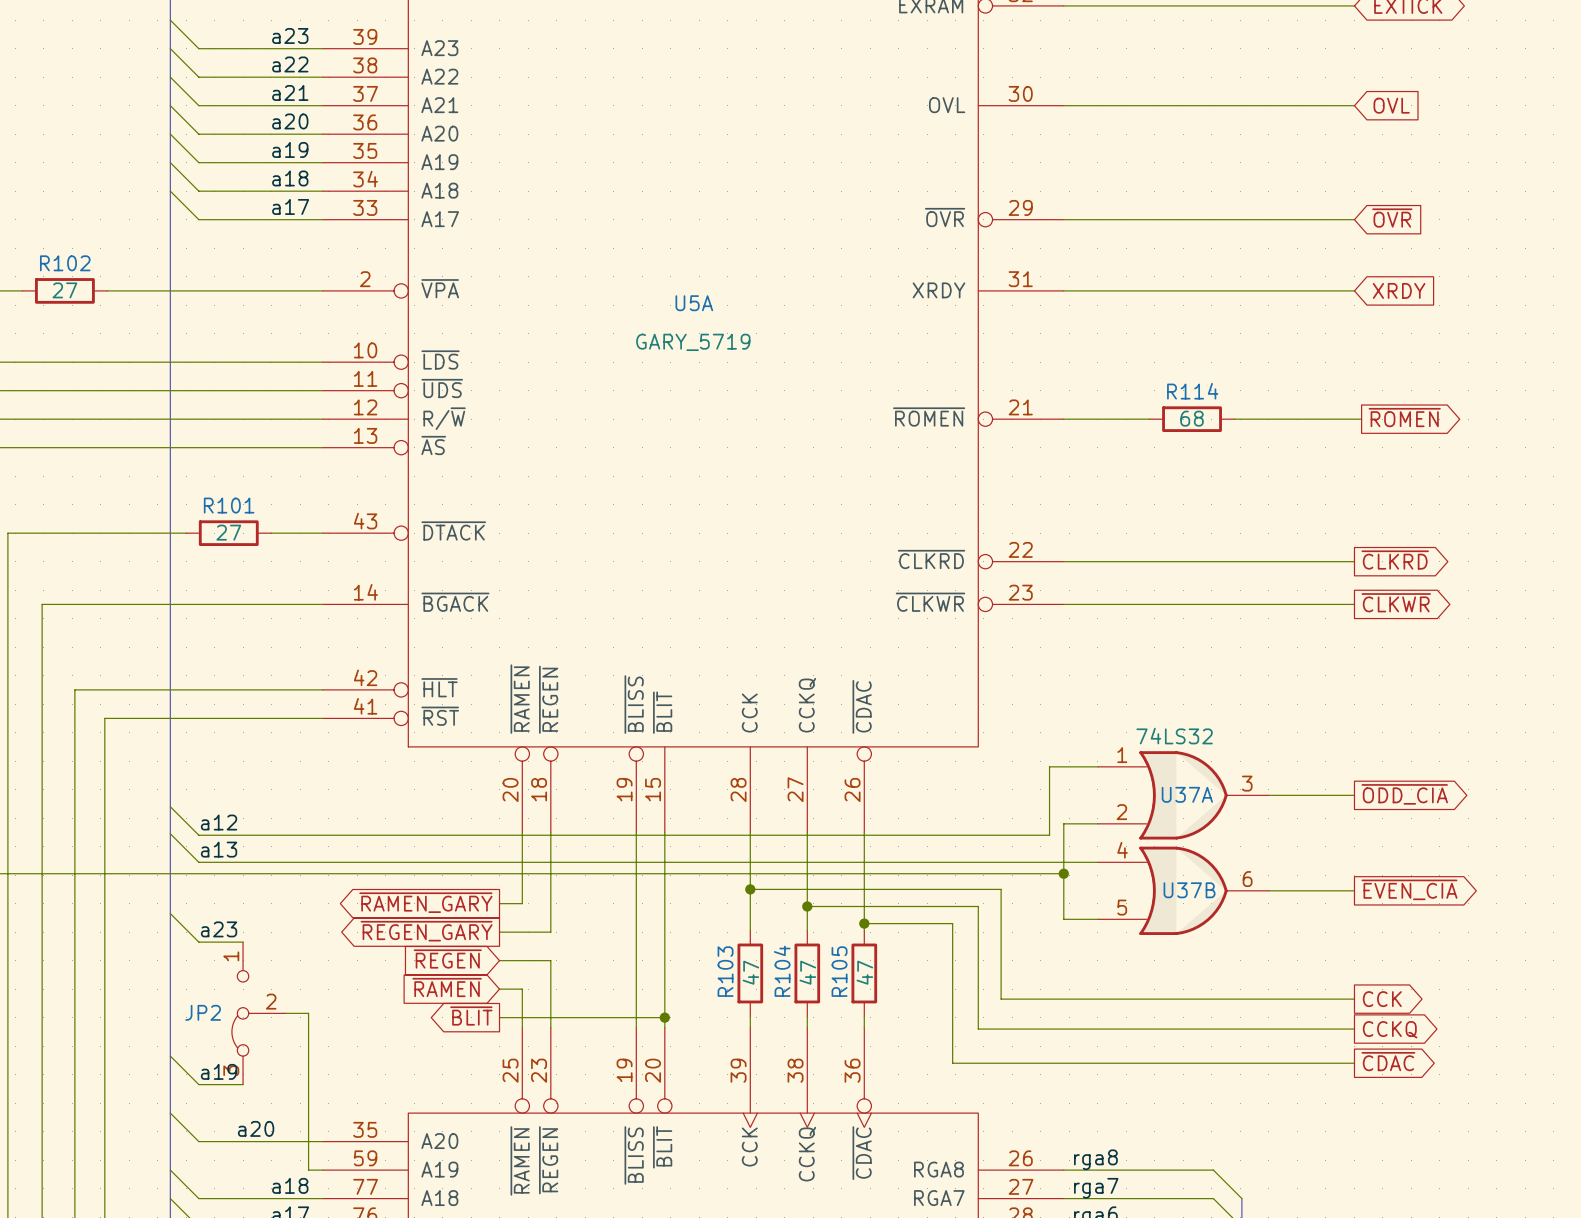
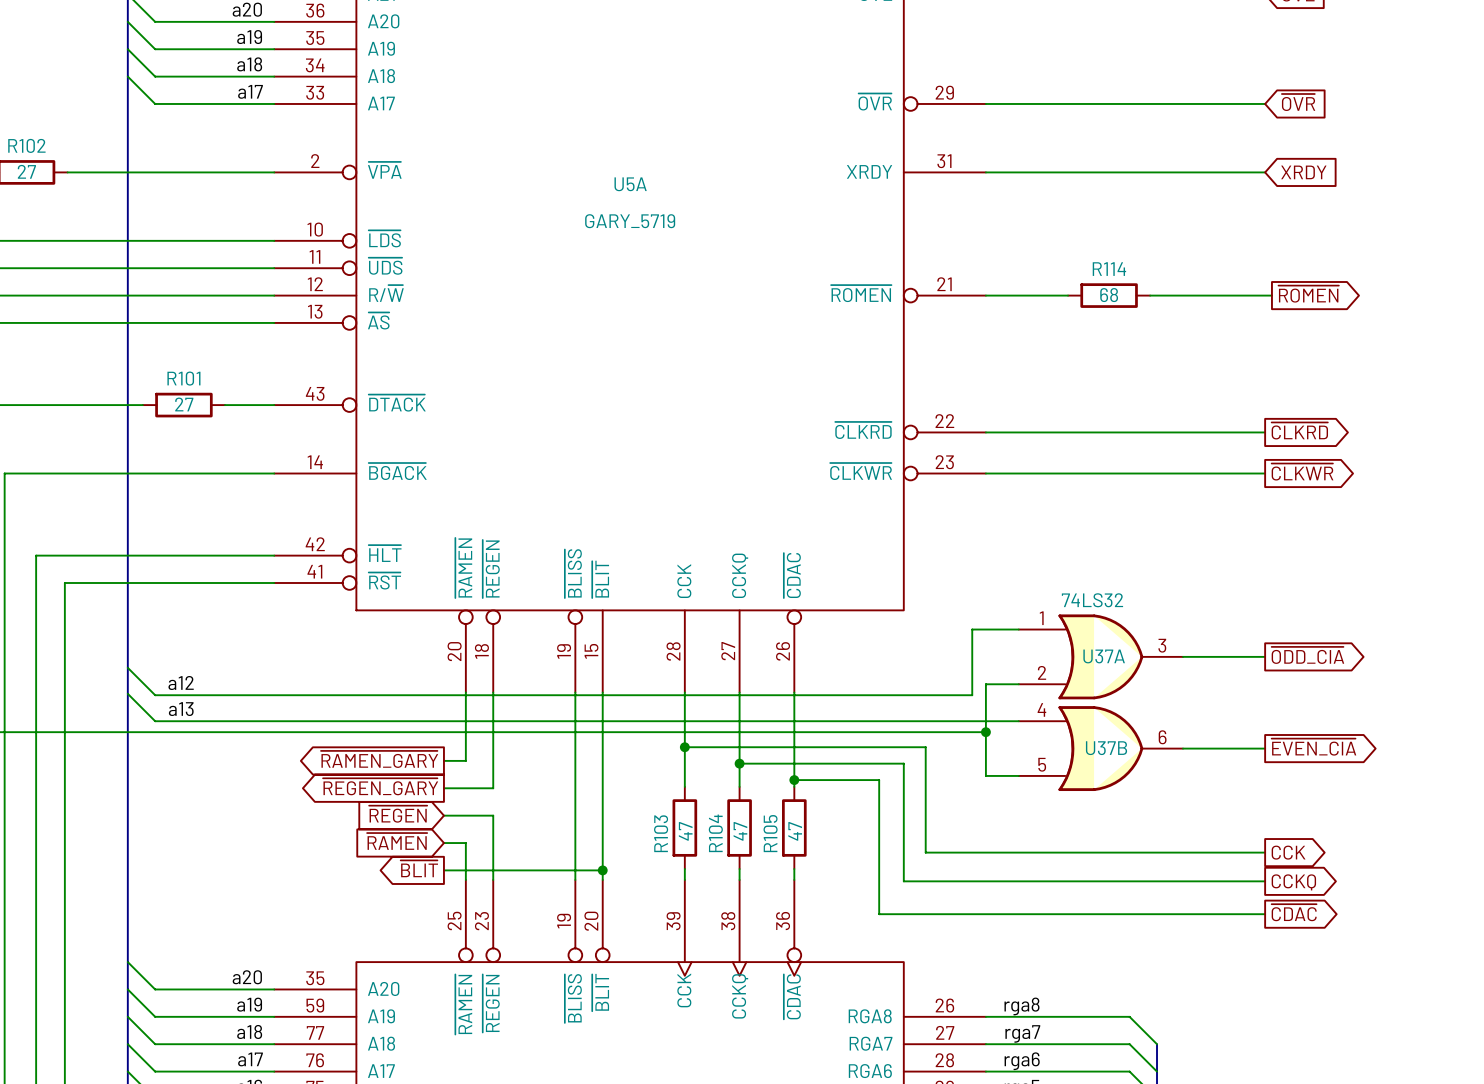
wire: (170, 913) (198, 942) (243, 942) -> none
label: a23 (219, 929) -> none
JP2: (258, 1013) -> none
wire: (285, 1013) (308, 1013) (308, 1170) -> (127, 989) (155, 1016) (260, 1016)
wire: (170, 1056) (198, 1084) (243, 1084) -> none
label position: a19 (219, 1071) -> a19 (249, 1004)
label position: a20 (256, 1128) -> a20 (247, 977)

